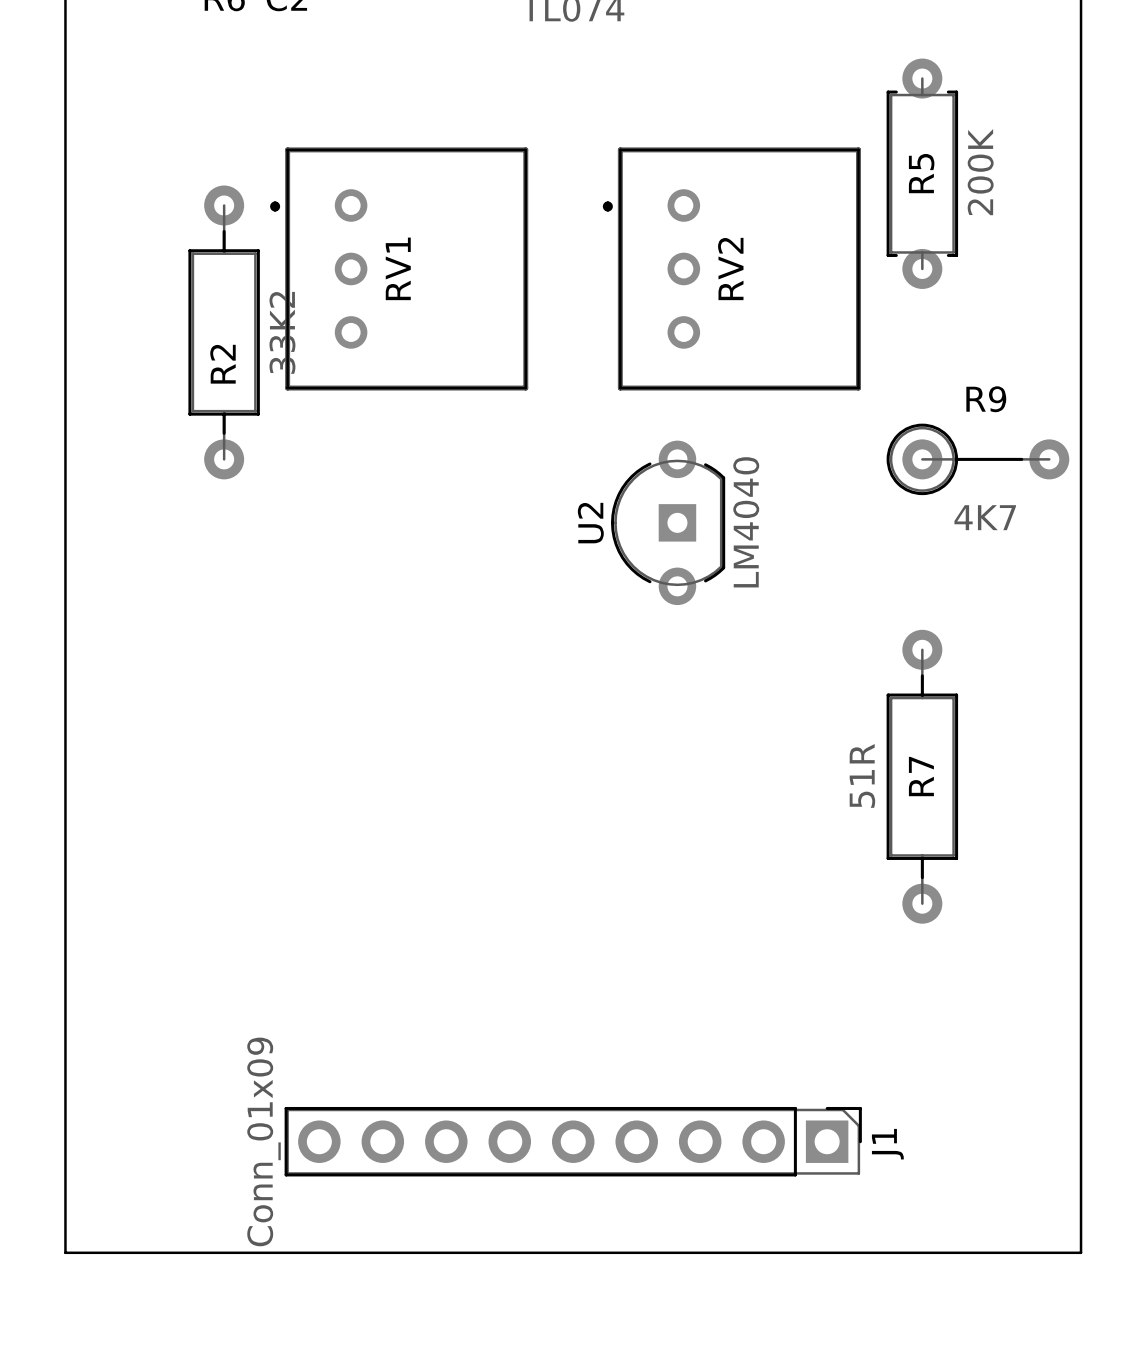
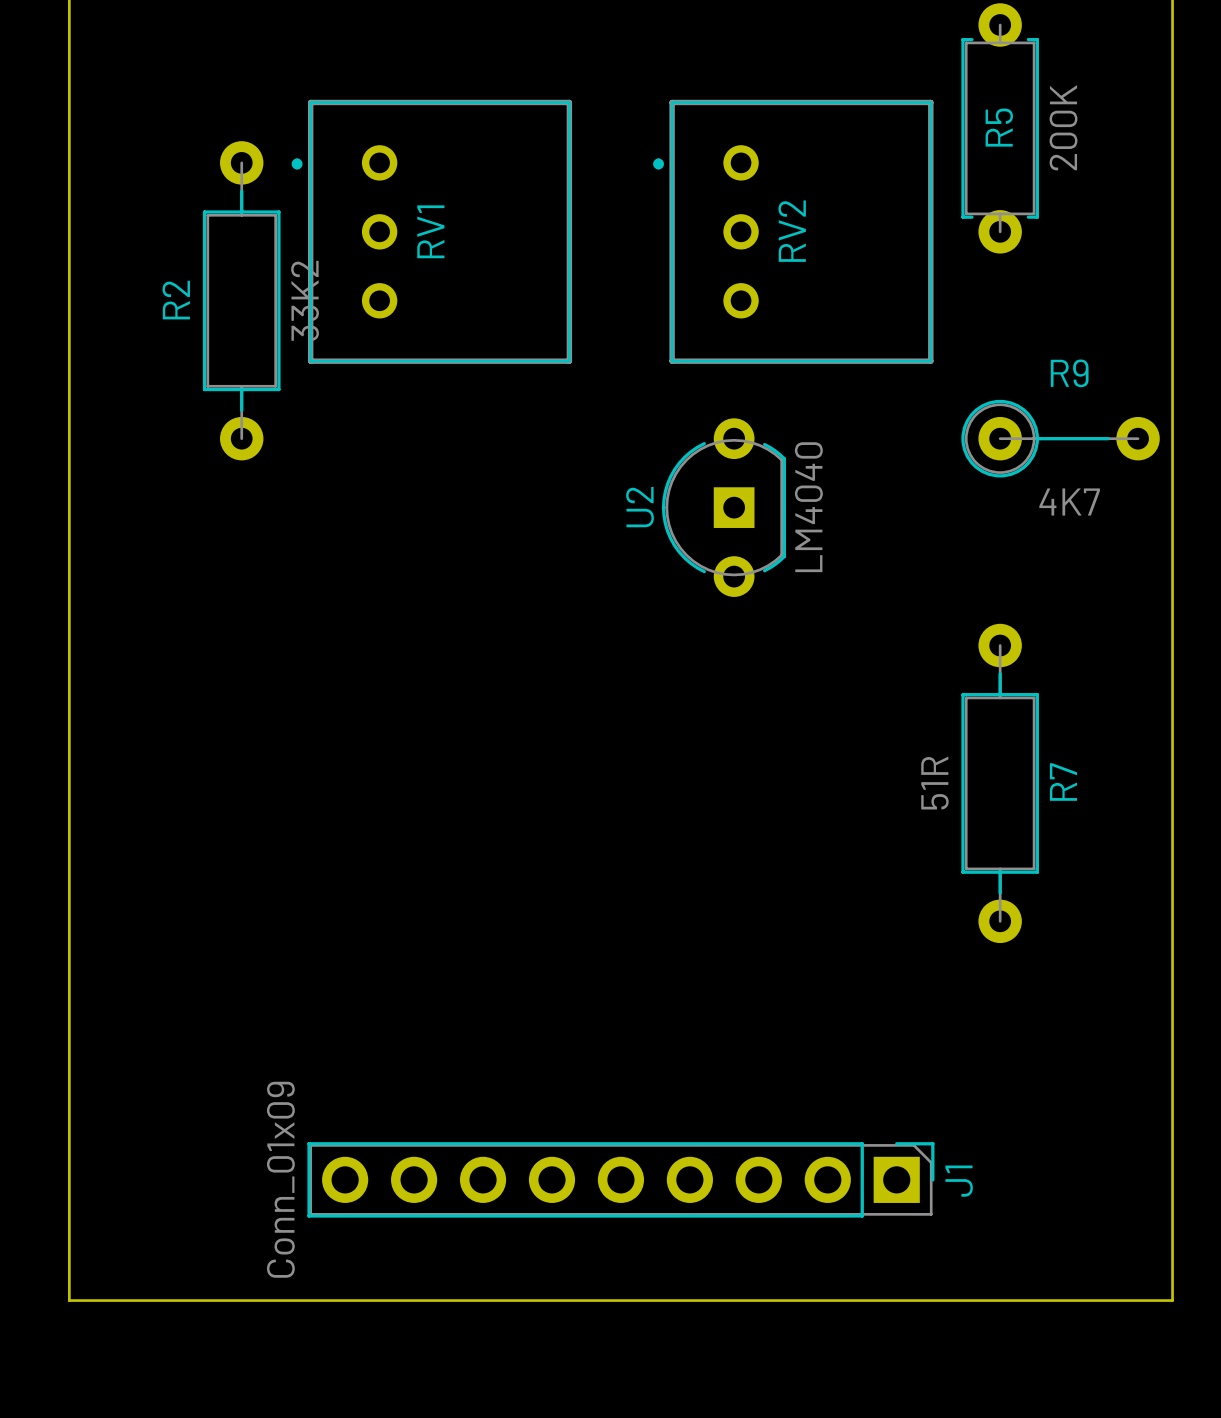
R2 name position: R2 (222, 364) -> R2 (176, 300)
R7 name position: R7 (921, 776) -> R7 (1063, 782)

